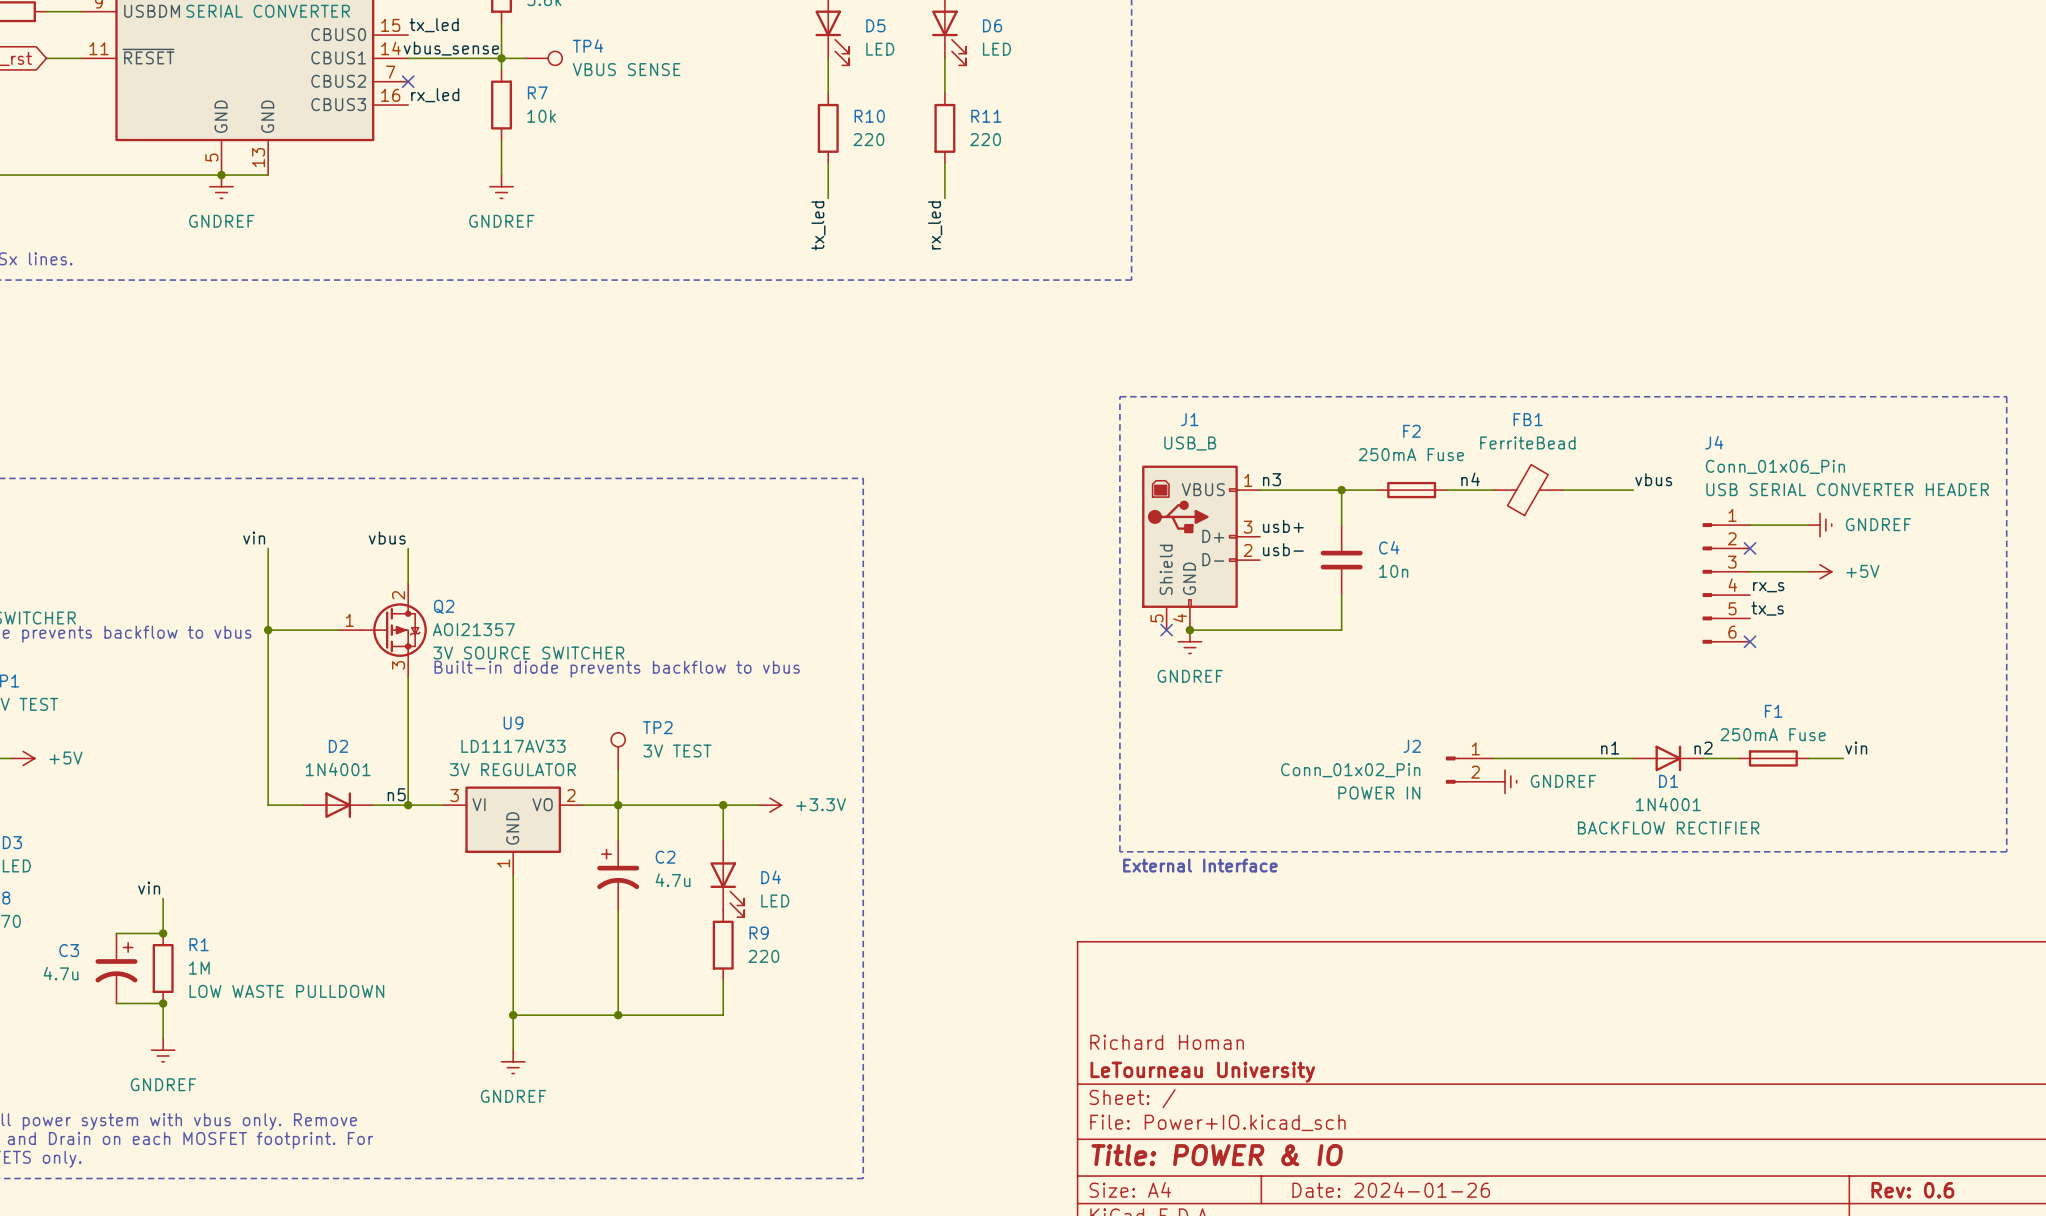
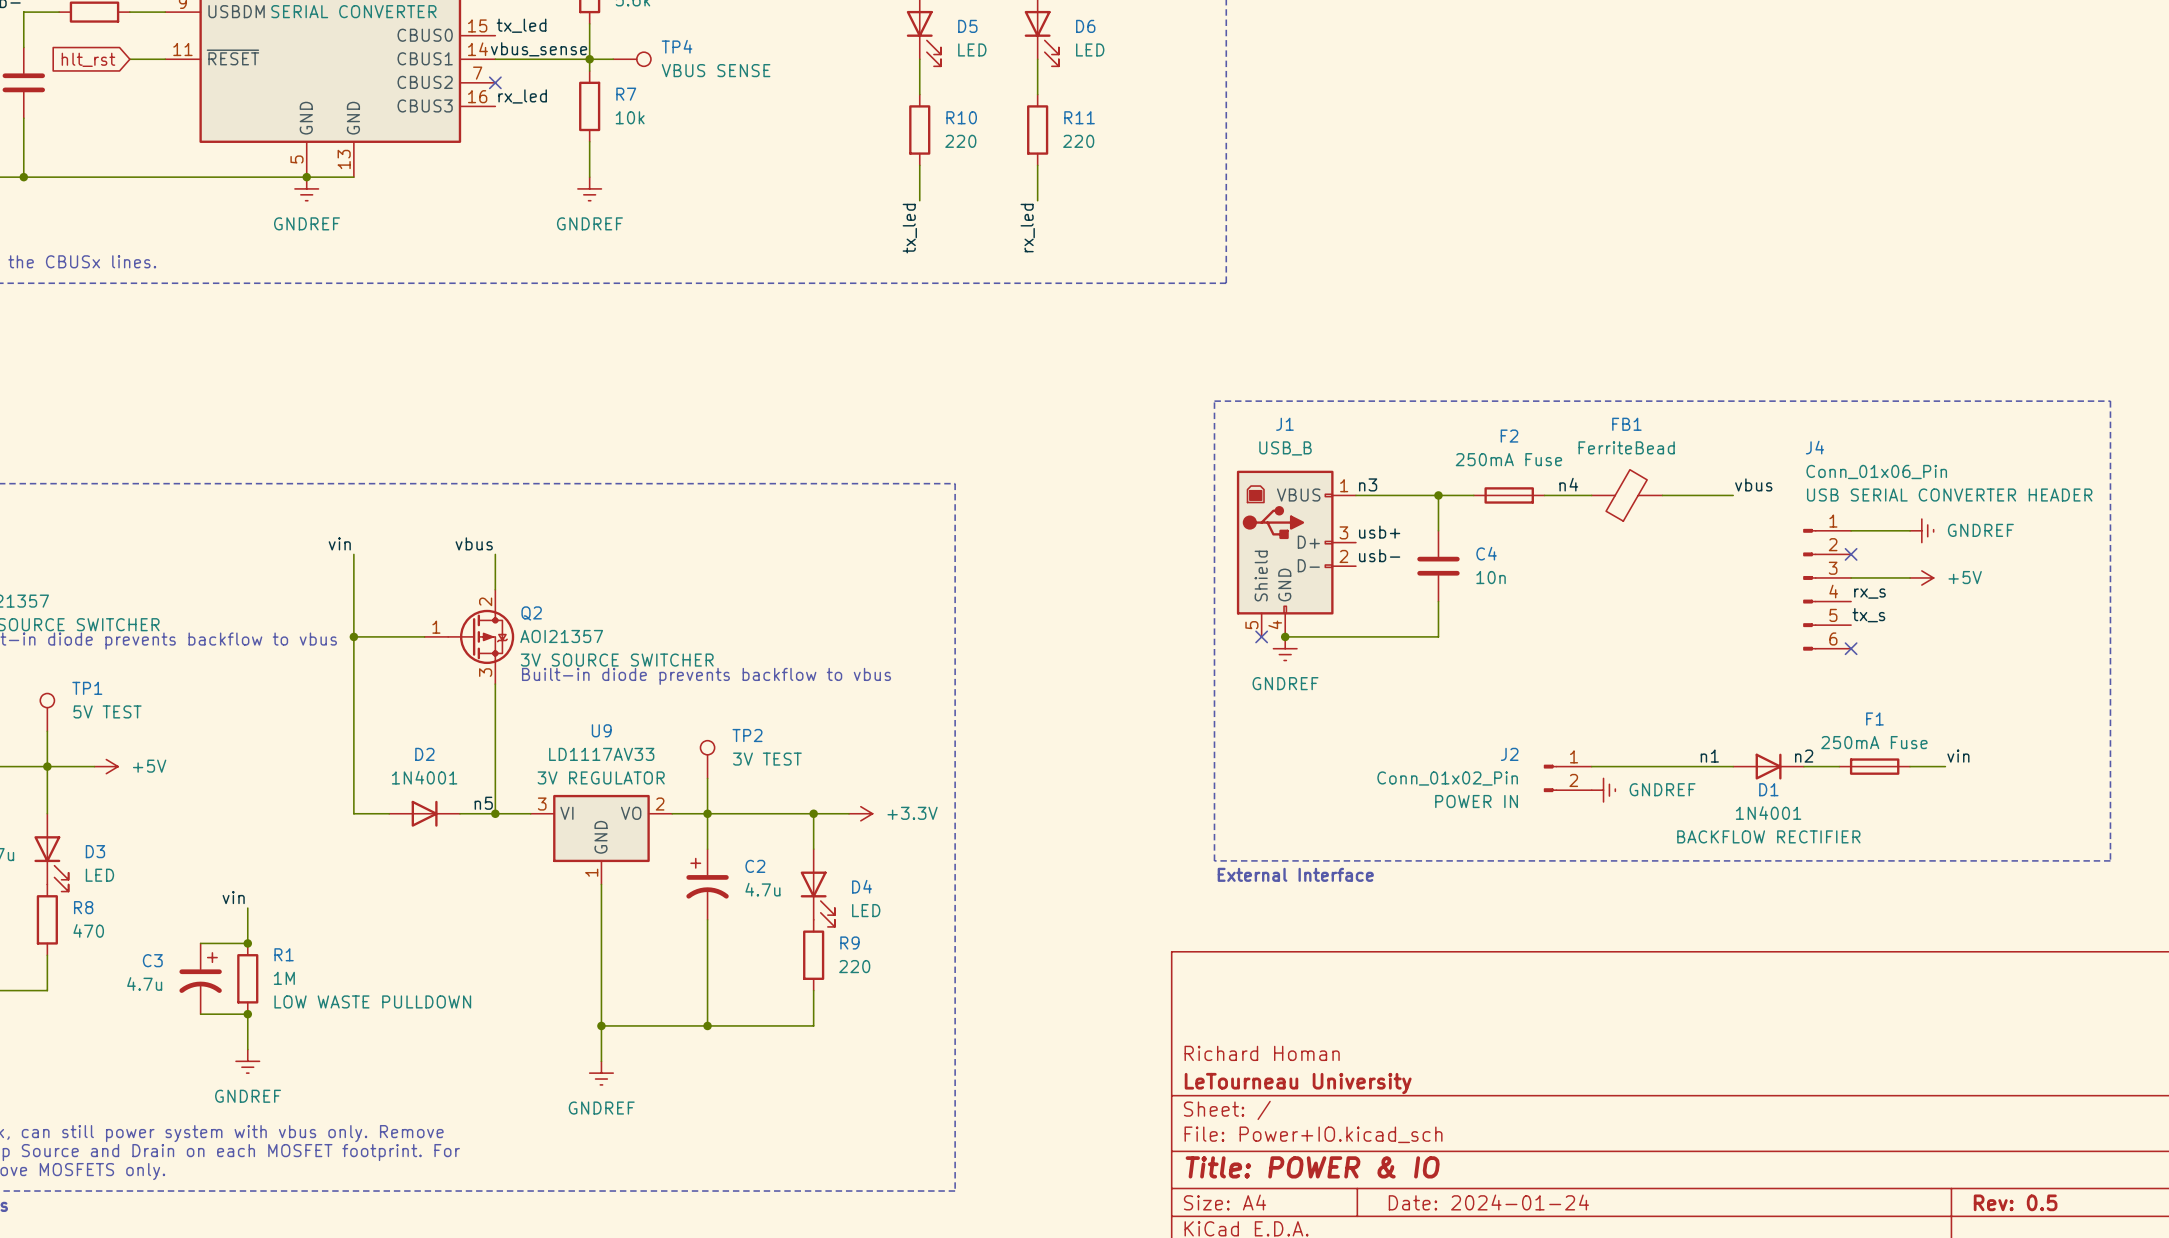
title block: Date: 2024-01-26 (1391, 1189) -> Date: 2024-01-24 (1488, 1202)
title block: Rev: 0.6 (1912, 1190) -> Rev: 0.5 (2015, 1202)

